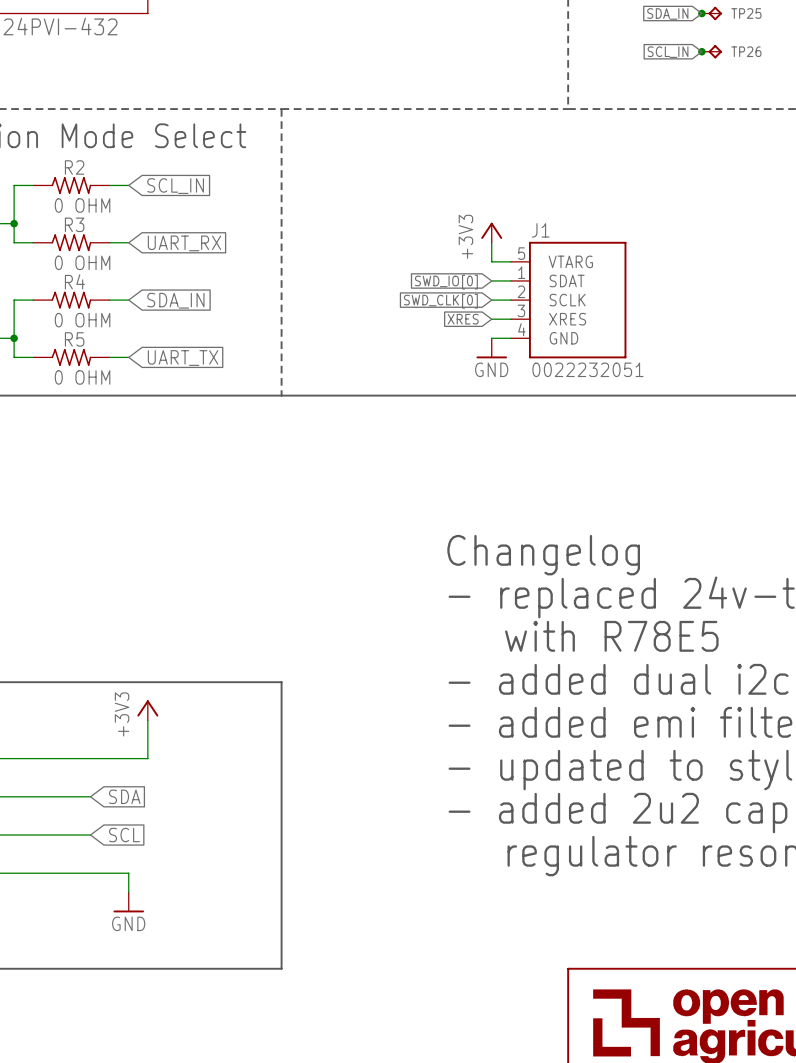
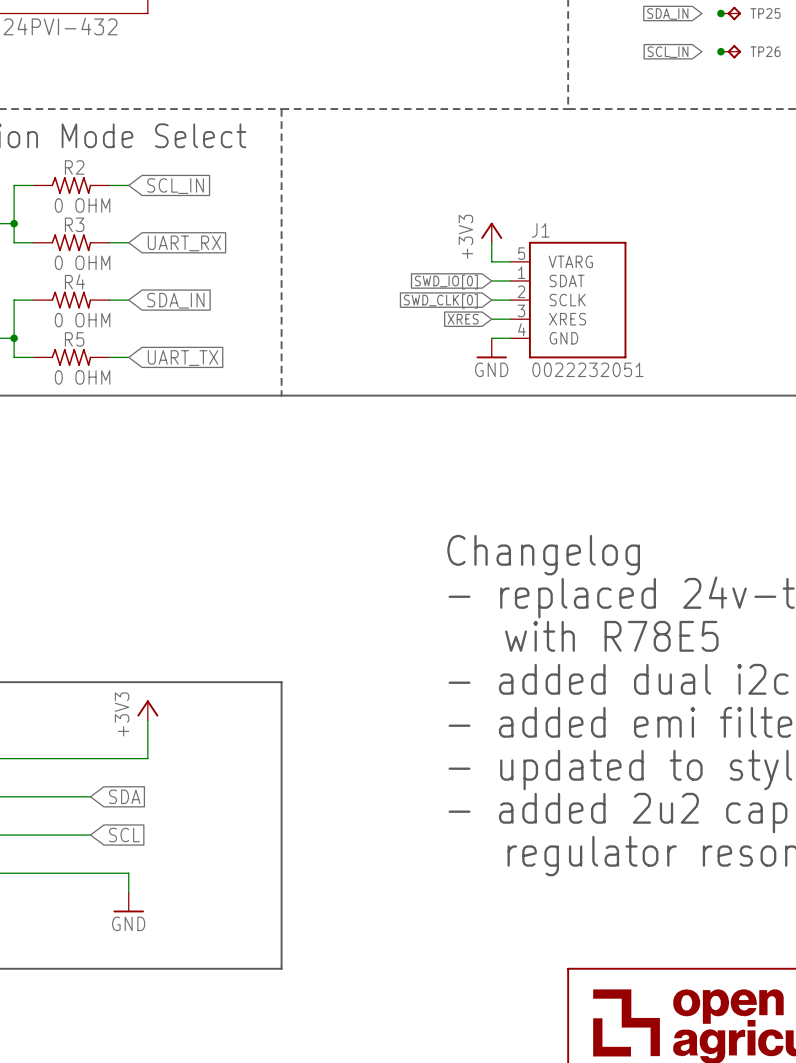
junction position: (701, 13) -> (720, 13)
TP25 position: (711, 13) -> (731, 13)
junction position: (701, 51) -> (720, 51)
TP26 position: (711, 51) -> (731, 51)

